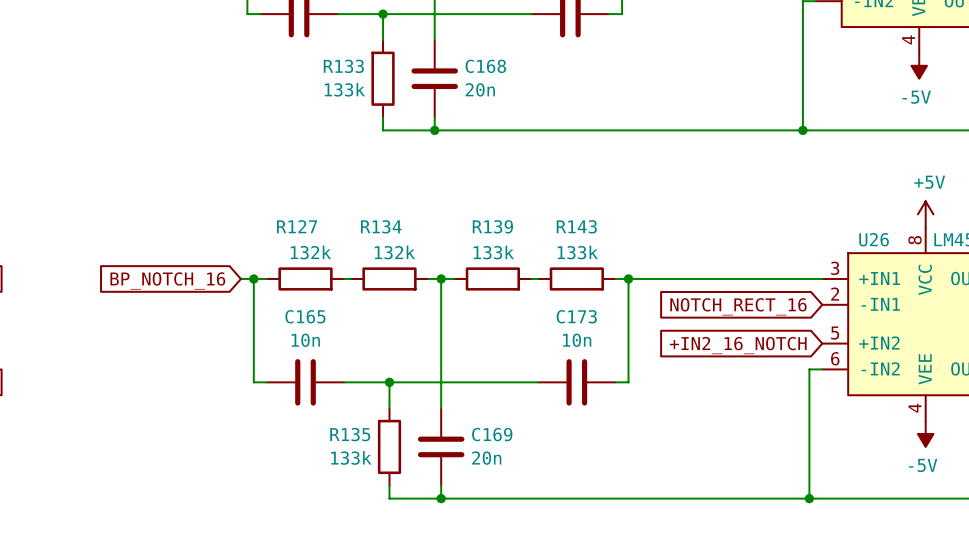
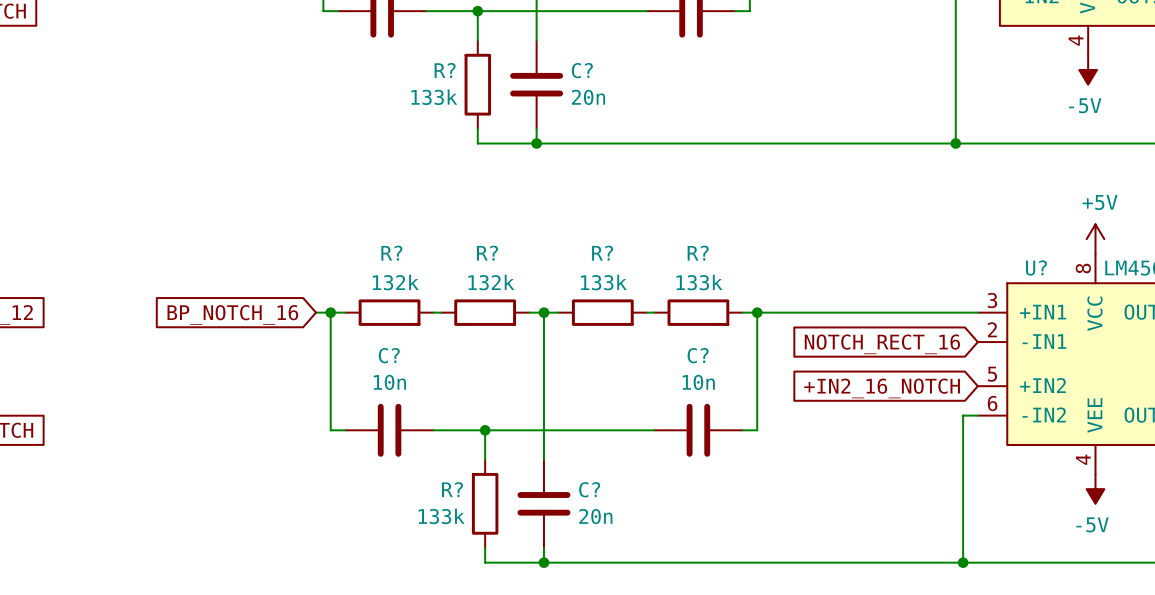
R133 name: R133 (343, 66) -> R? (445, 70)
C168 name: C168 (485, 66) -> C? (582, 70)
R127 name: R127 (297, 226) -> R? (391, 253)
R134 name: R134 (381, 226) -> R? (487, 253)
R139 name: R139 (492, 226) -> R? (602, 253)
R143 name: R143 (576, 226) -> R? (698, 253)
U26 name: U26 (874, 239) -> U? (1036, 267)
C165 name: C165 (305, 316) -> C? (389, 355)
C173 name: C173 (576, 316) -> C? (698, 355)
R135 name: R135 (350, 434) -> R? (452, 489)
C169 name: C169 (492, 434) -> C? (589, 489)

